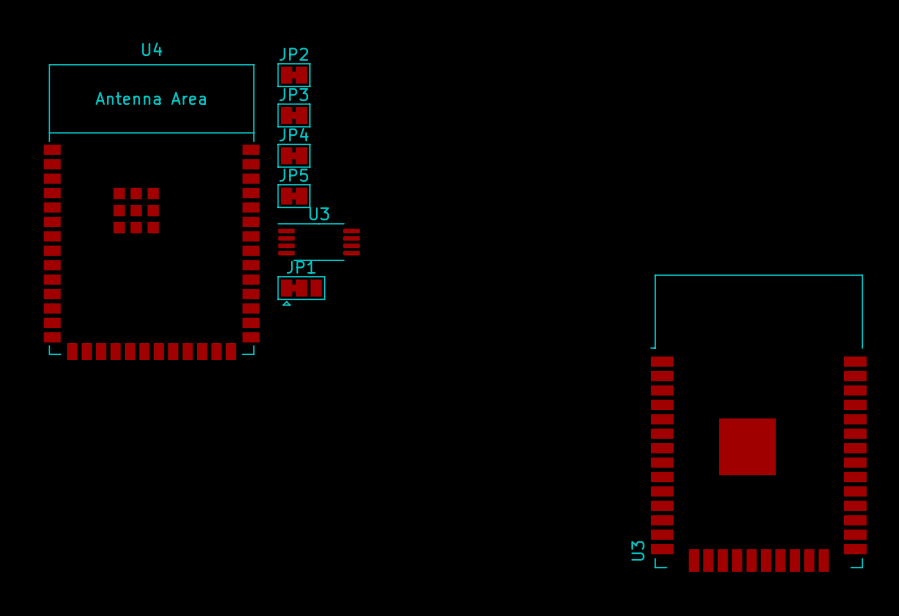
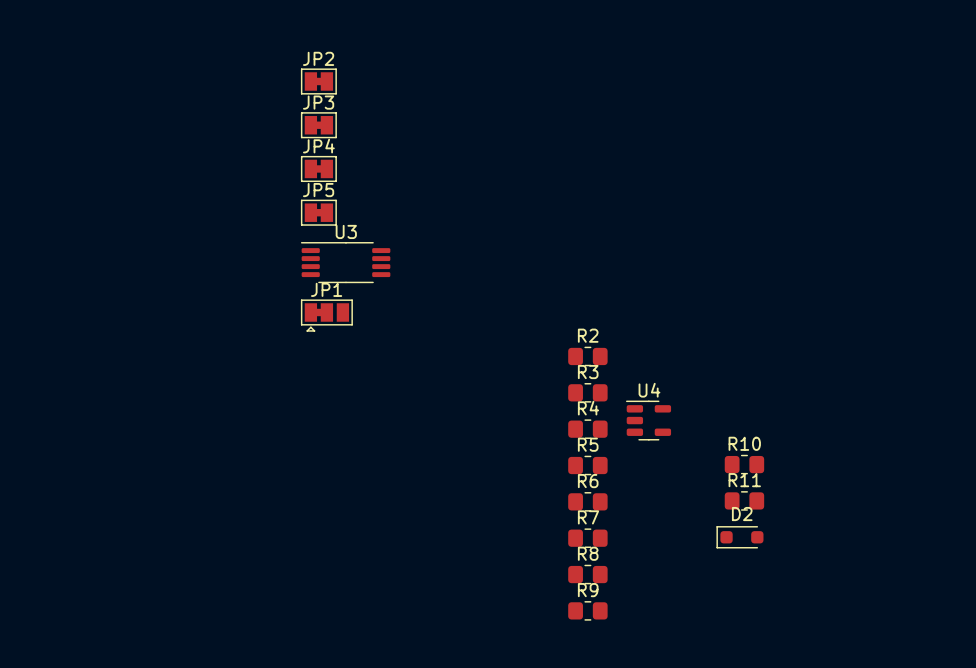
U4 name position: U4 (152, 49) -> U4 (649, 390)
U4 footprint: [43, 64, 260, 361] -> [625, 400, 672, 441]
R2: none -> (587, 356)
R3: none -> (587, 392)
R4: none -> (587, 429)
U3: (758, 423) -> none
R10: none -> (744, 464)
R5: none -> (587, 465)
R11: none -> (744, 500)
R6: none -> (587, 501)
D2: none -> (739, 537)
R7: none -> (587, 538)
R8: none -> (587, 574)
R9: none -> (587, 610)

